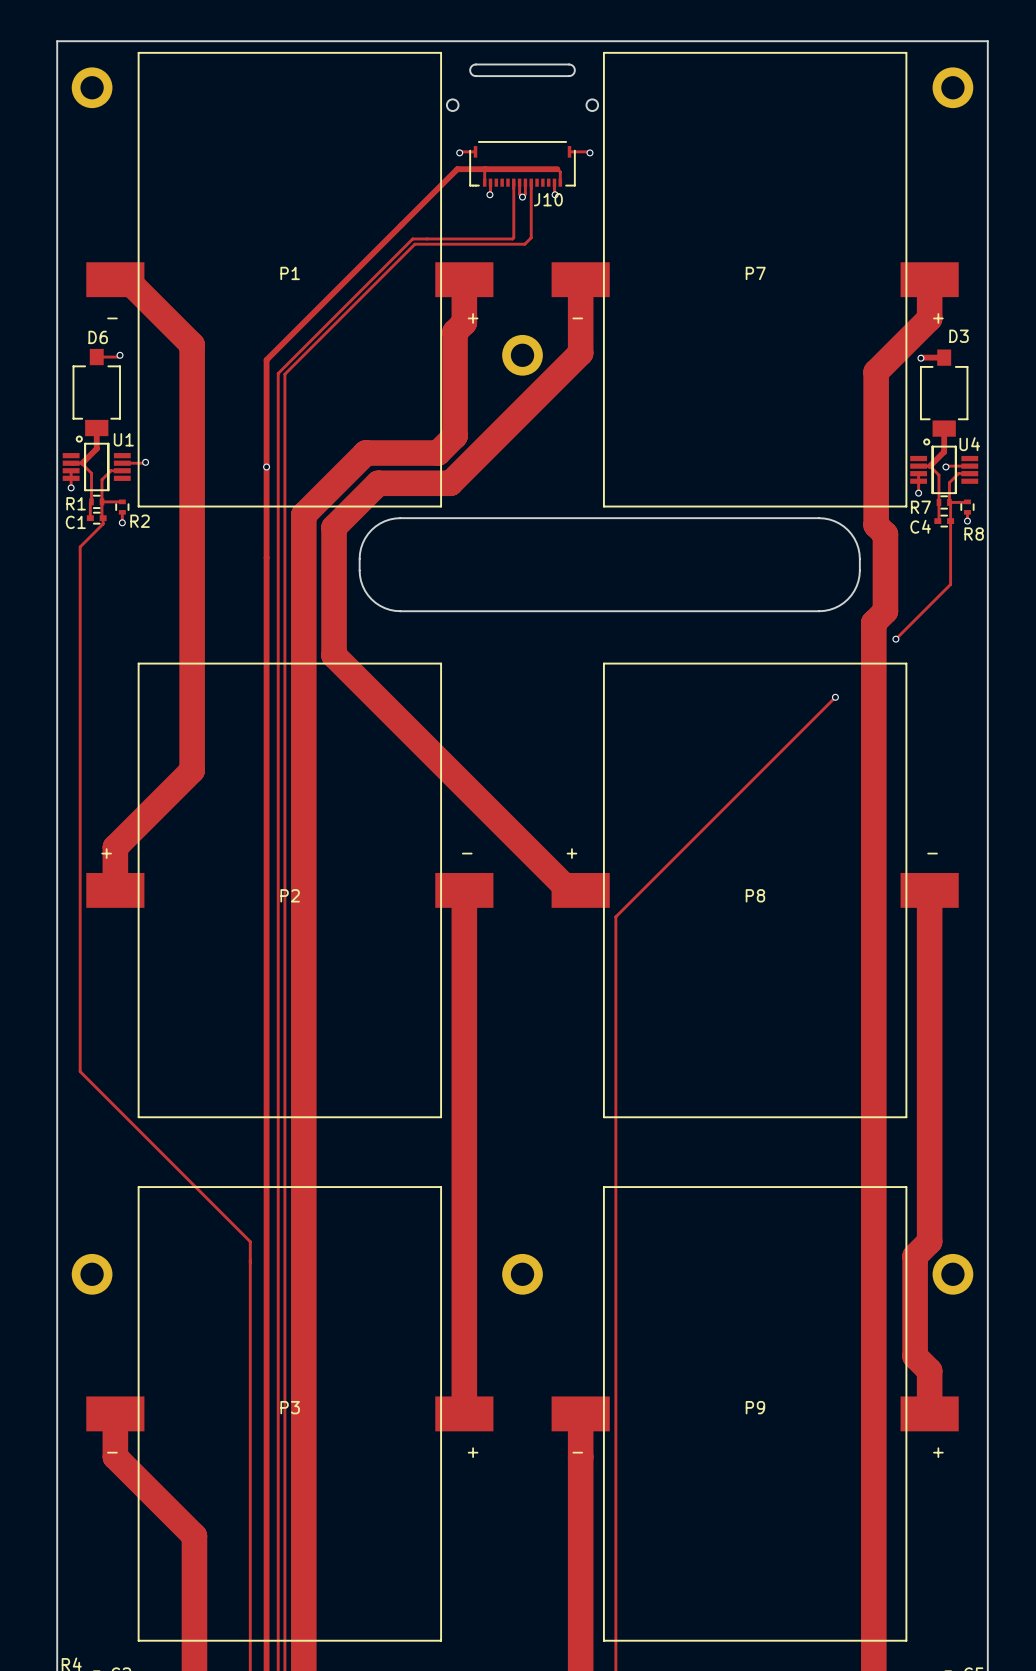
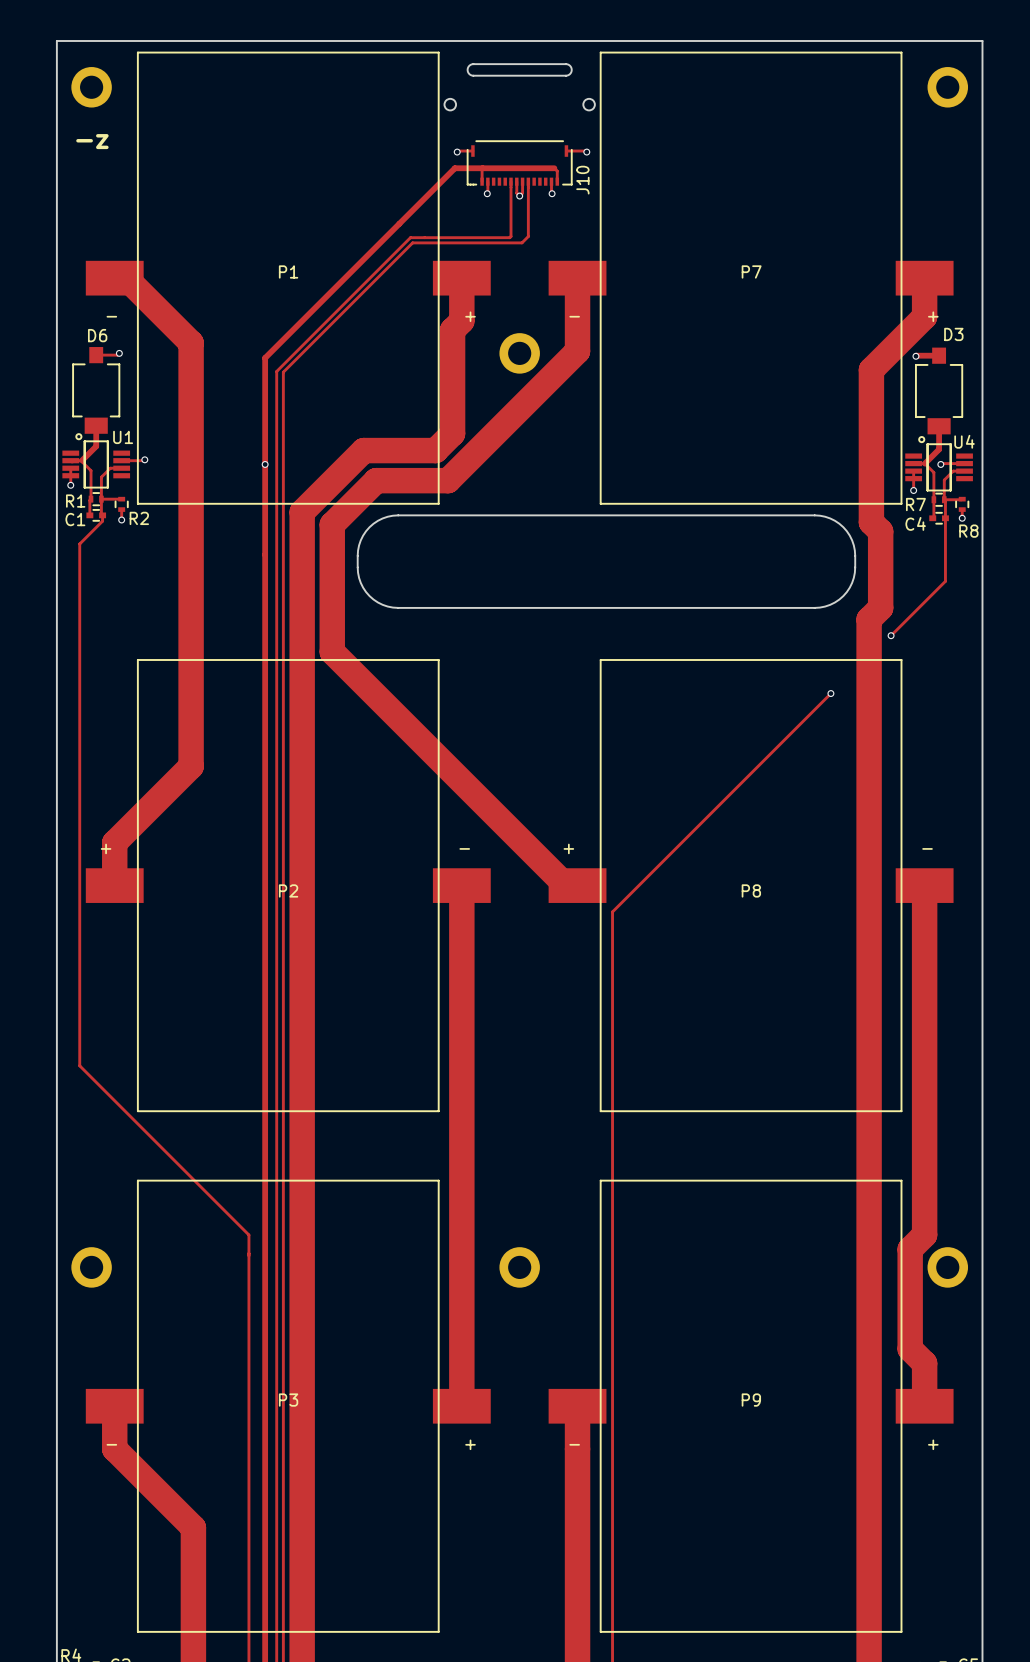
text: none -> -z (92, 141)
J10 name rotation: 0° (548, 199) -> 90° counterclockwise (582, 180)
J10 name position: J10 (548, 199) -> J10 (582, 180)

